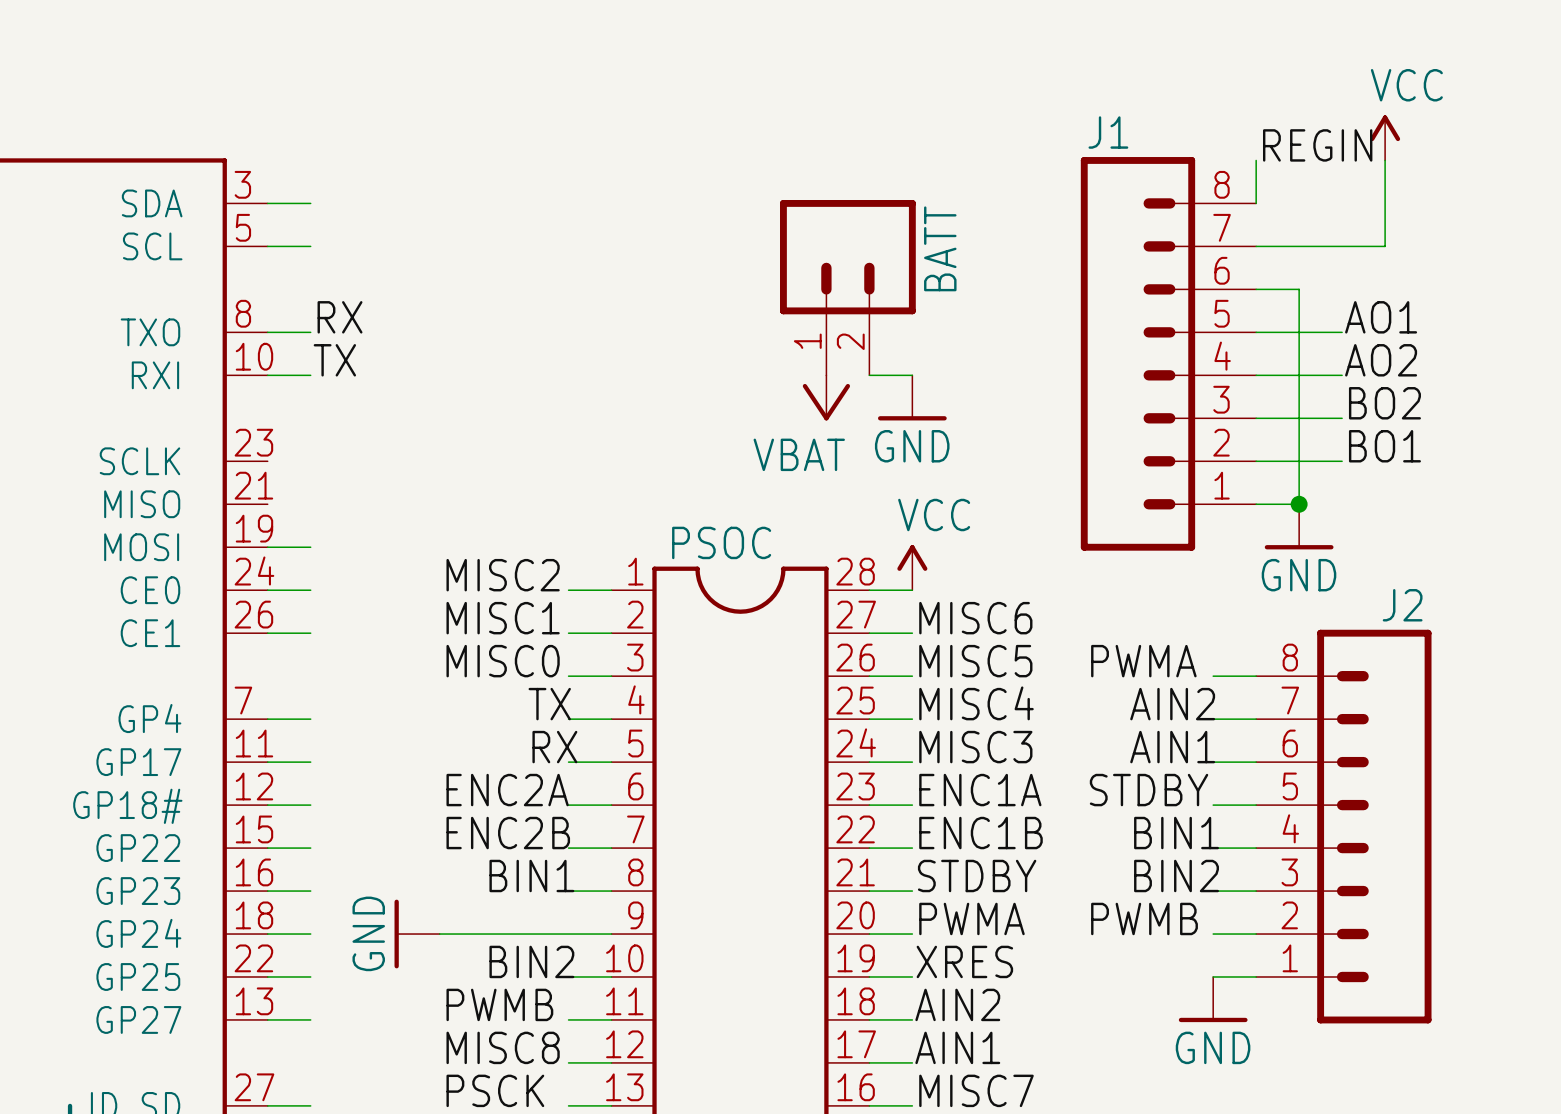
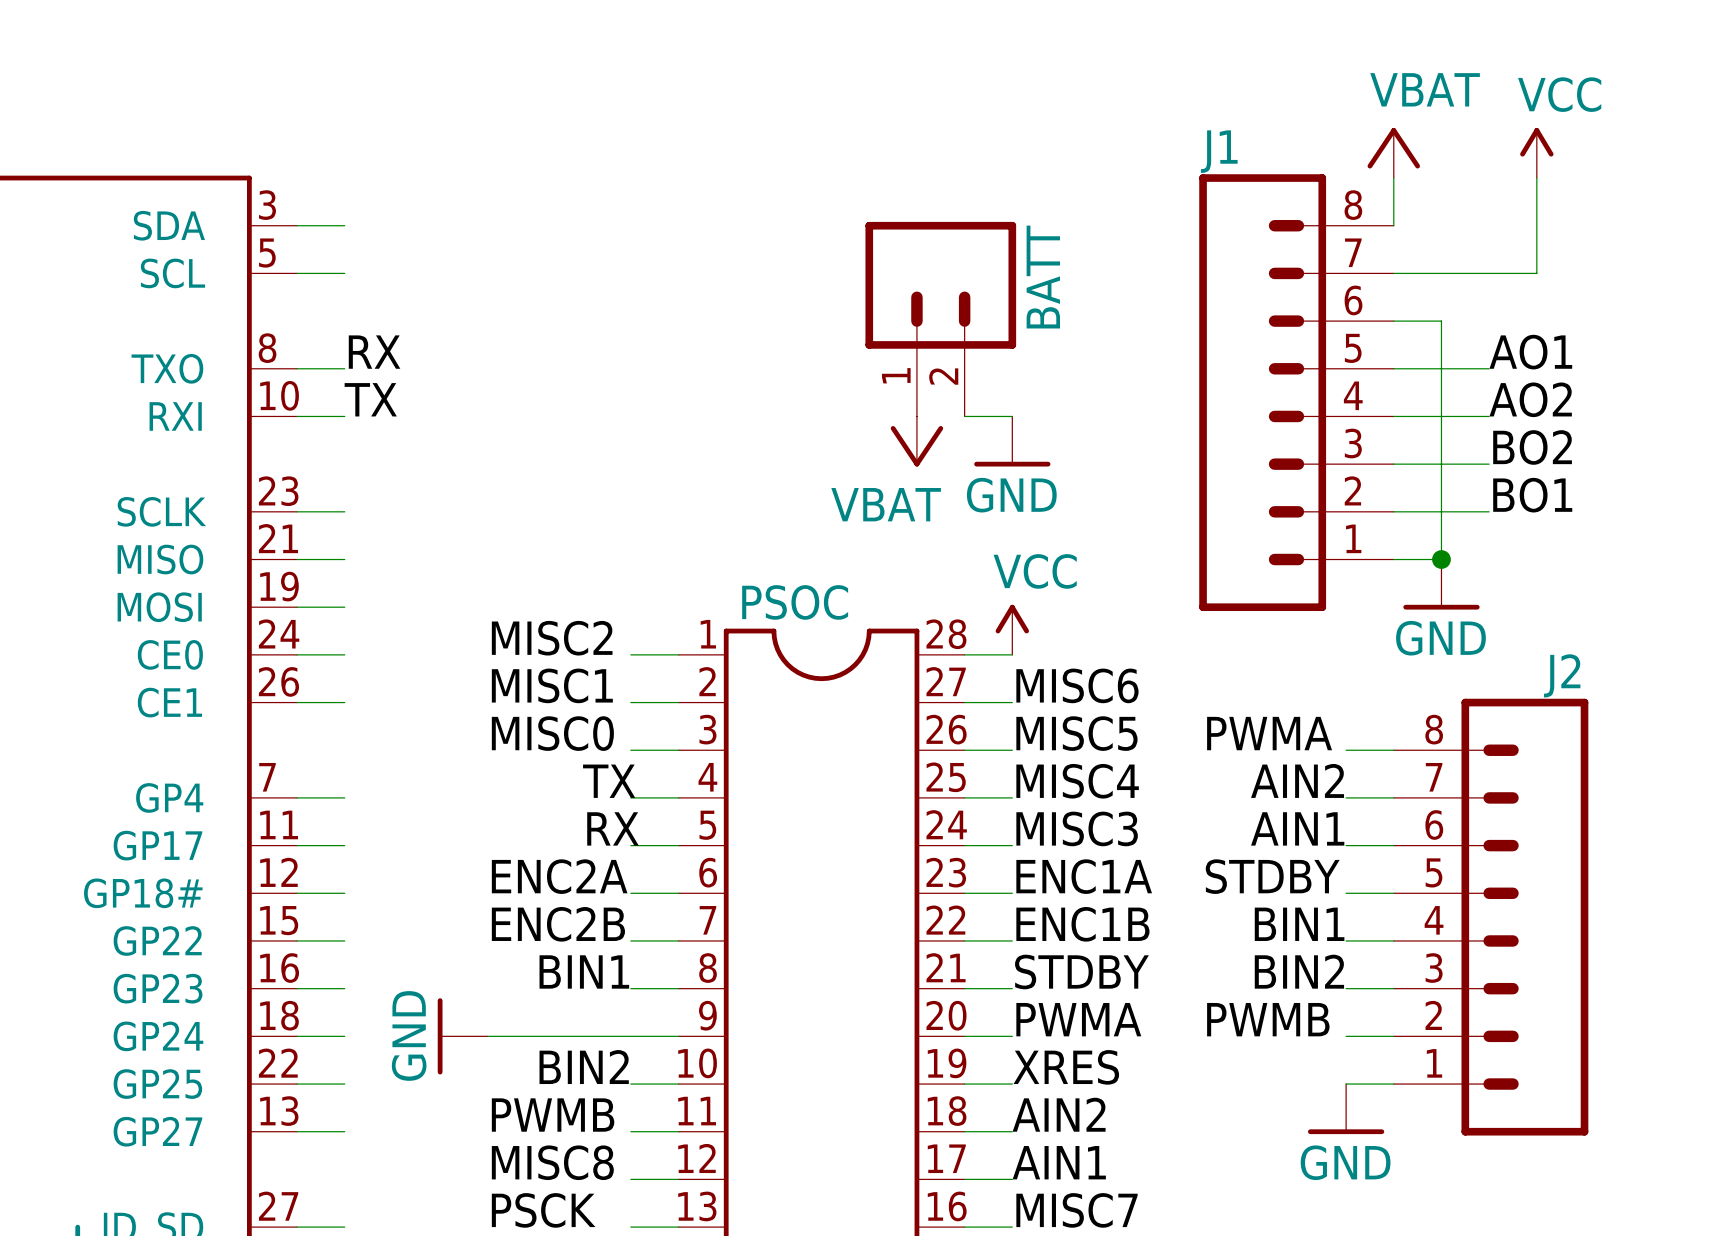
power symbol: none -> VBAT (1393, 153)
label: REGIN (1317, 145) -> none
wire: none -> (297, 511) (344, 511)
wire: none -> (297, 559) (344, 559)

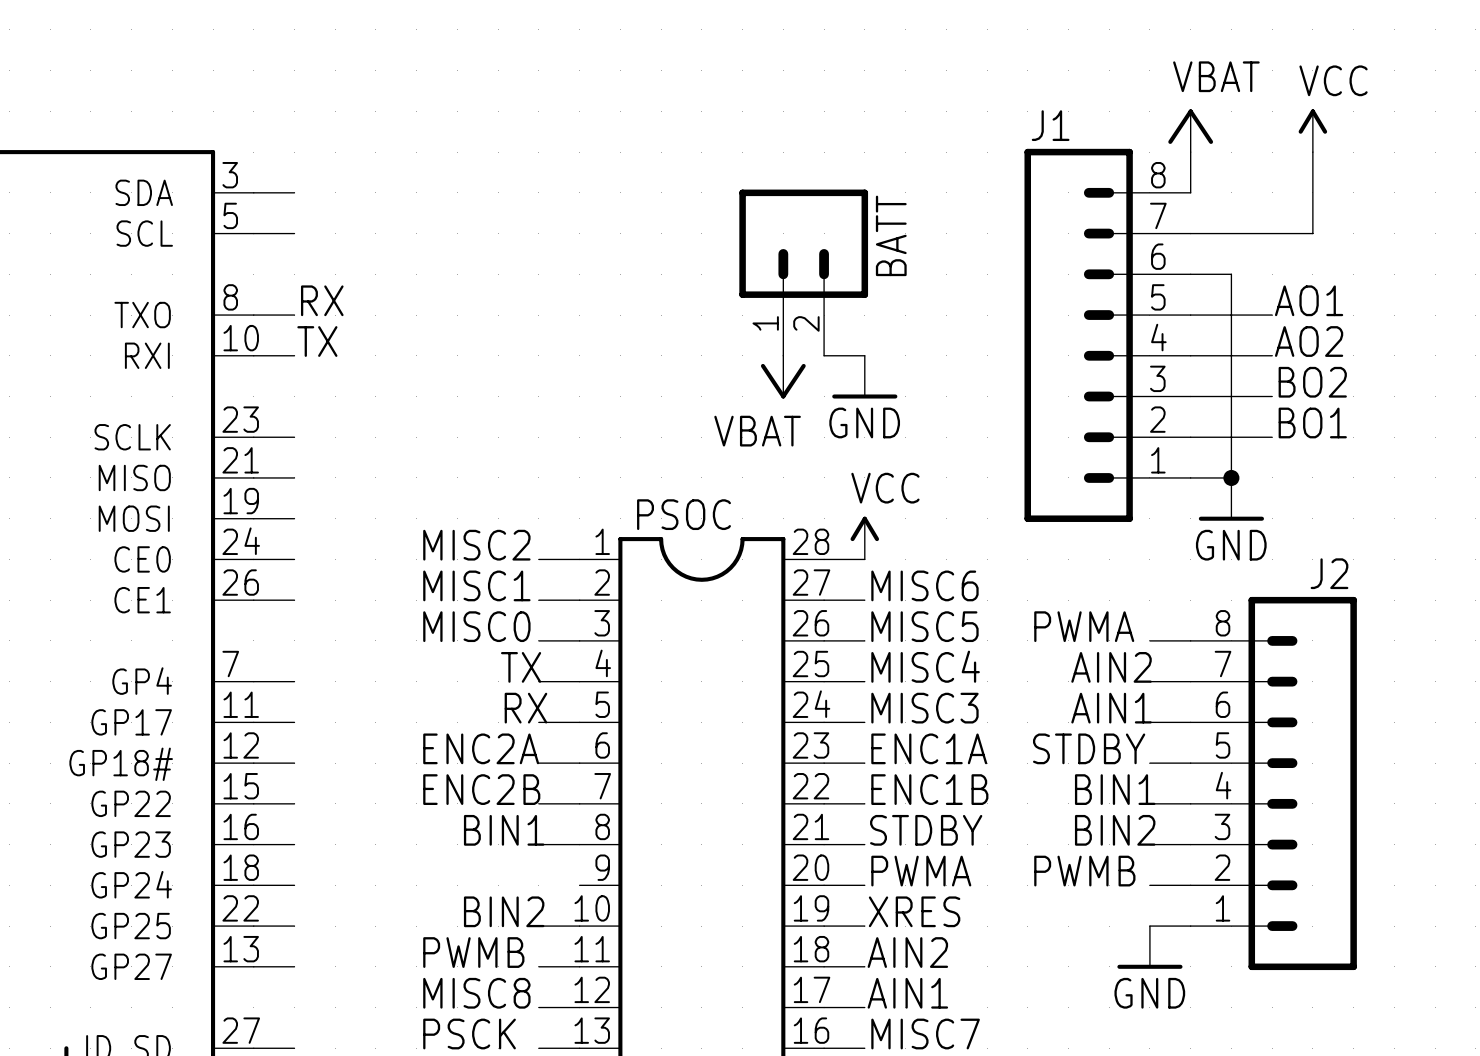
power symbol: GND (462, 1036) -> none
wire: (487, 1036) (678, 1036) -> none

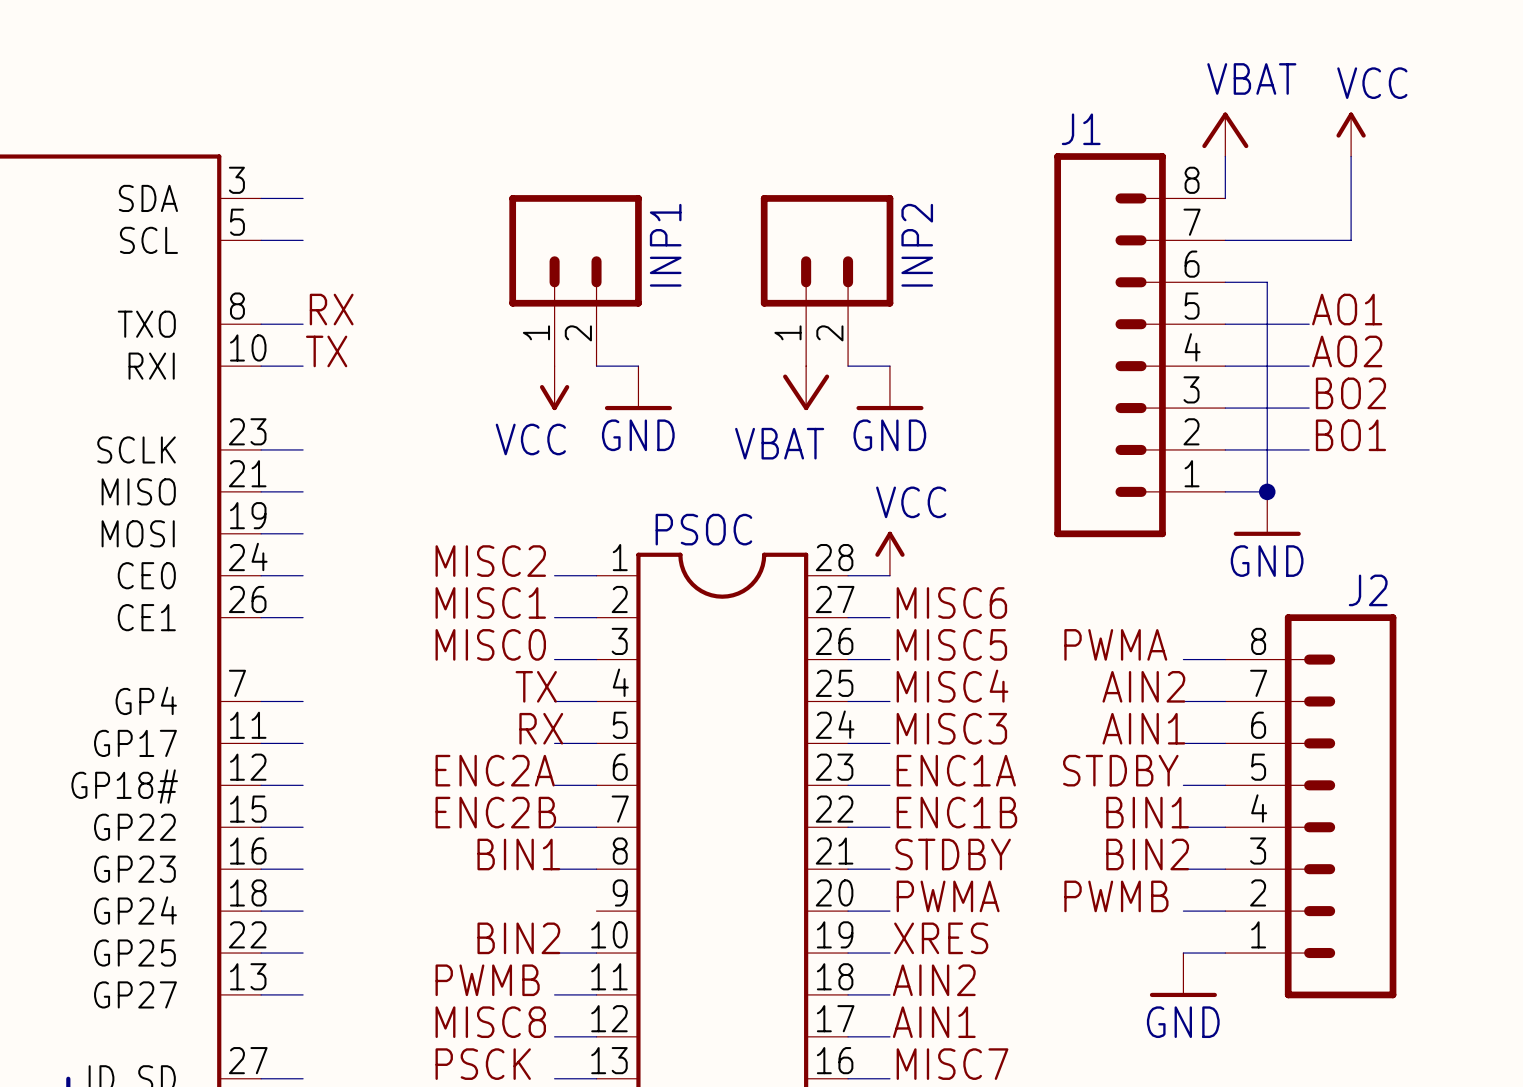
BATT name: BATT (891, 235) -> INP2 (917, 245)
INP1: none -> (575, 280)
wire: none -> (596, 366) (638, 366)
power symbol: none -> VCC (554, 388)
power symbol: none -> GND (638, 388)

